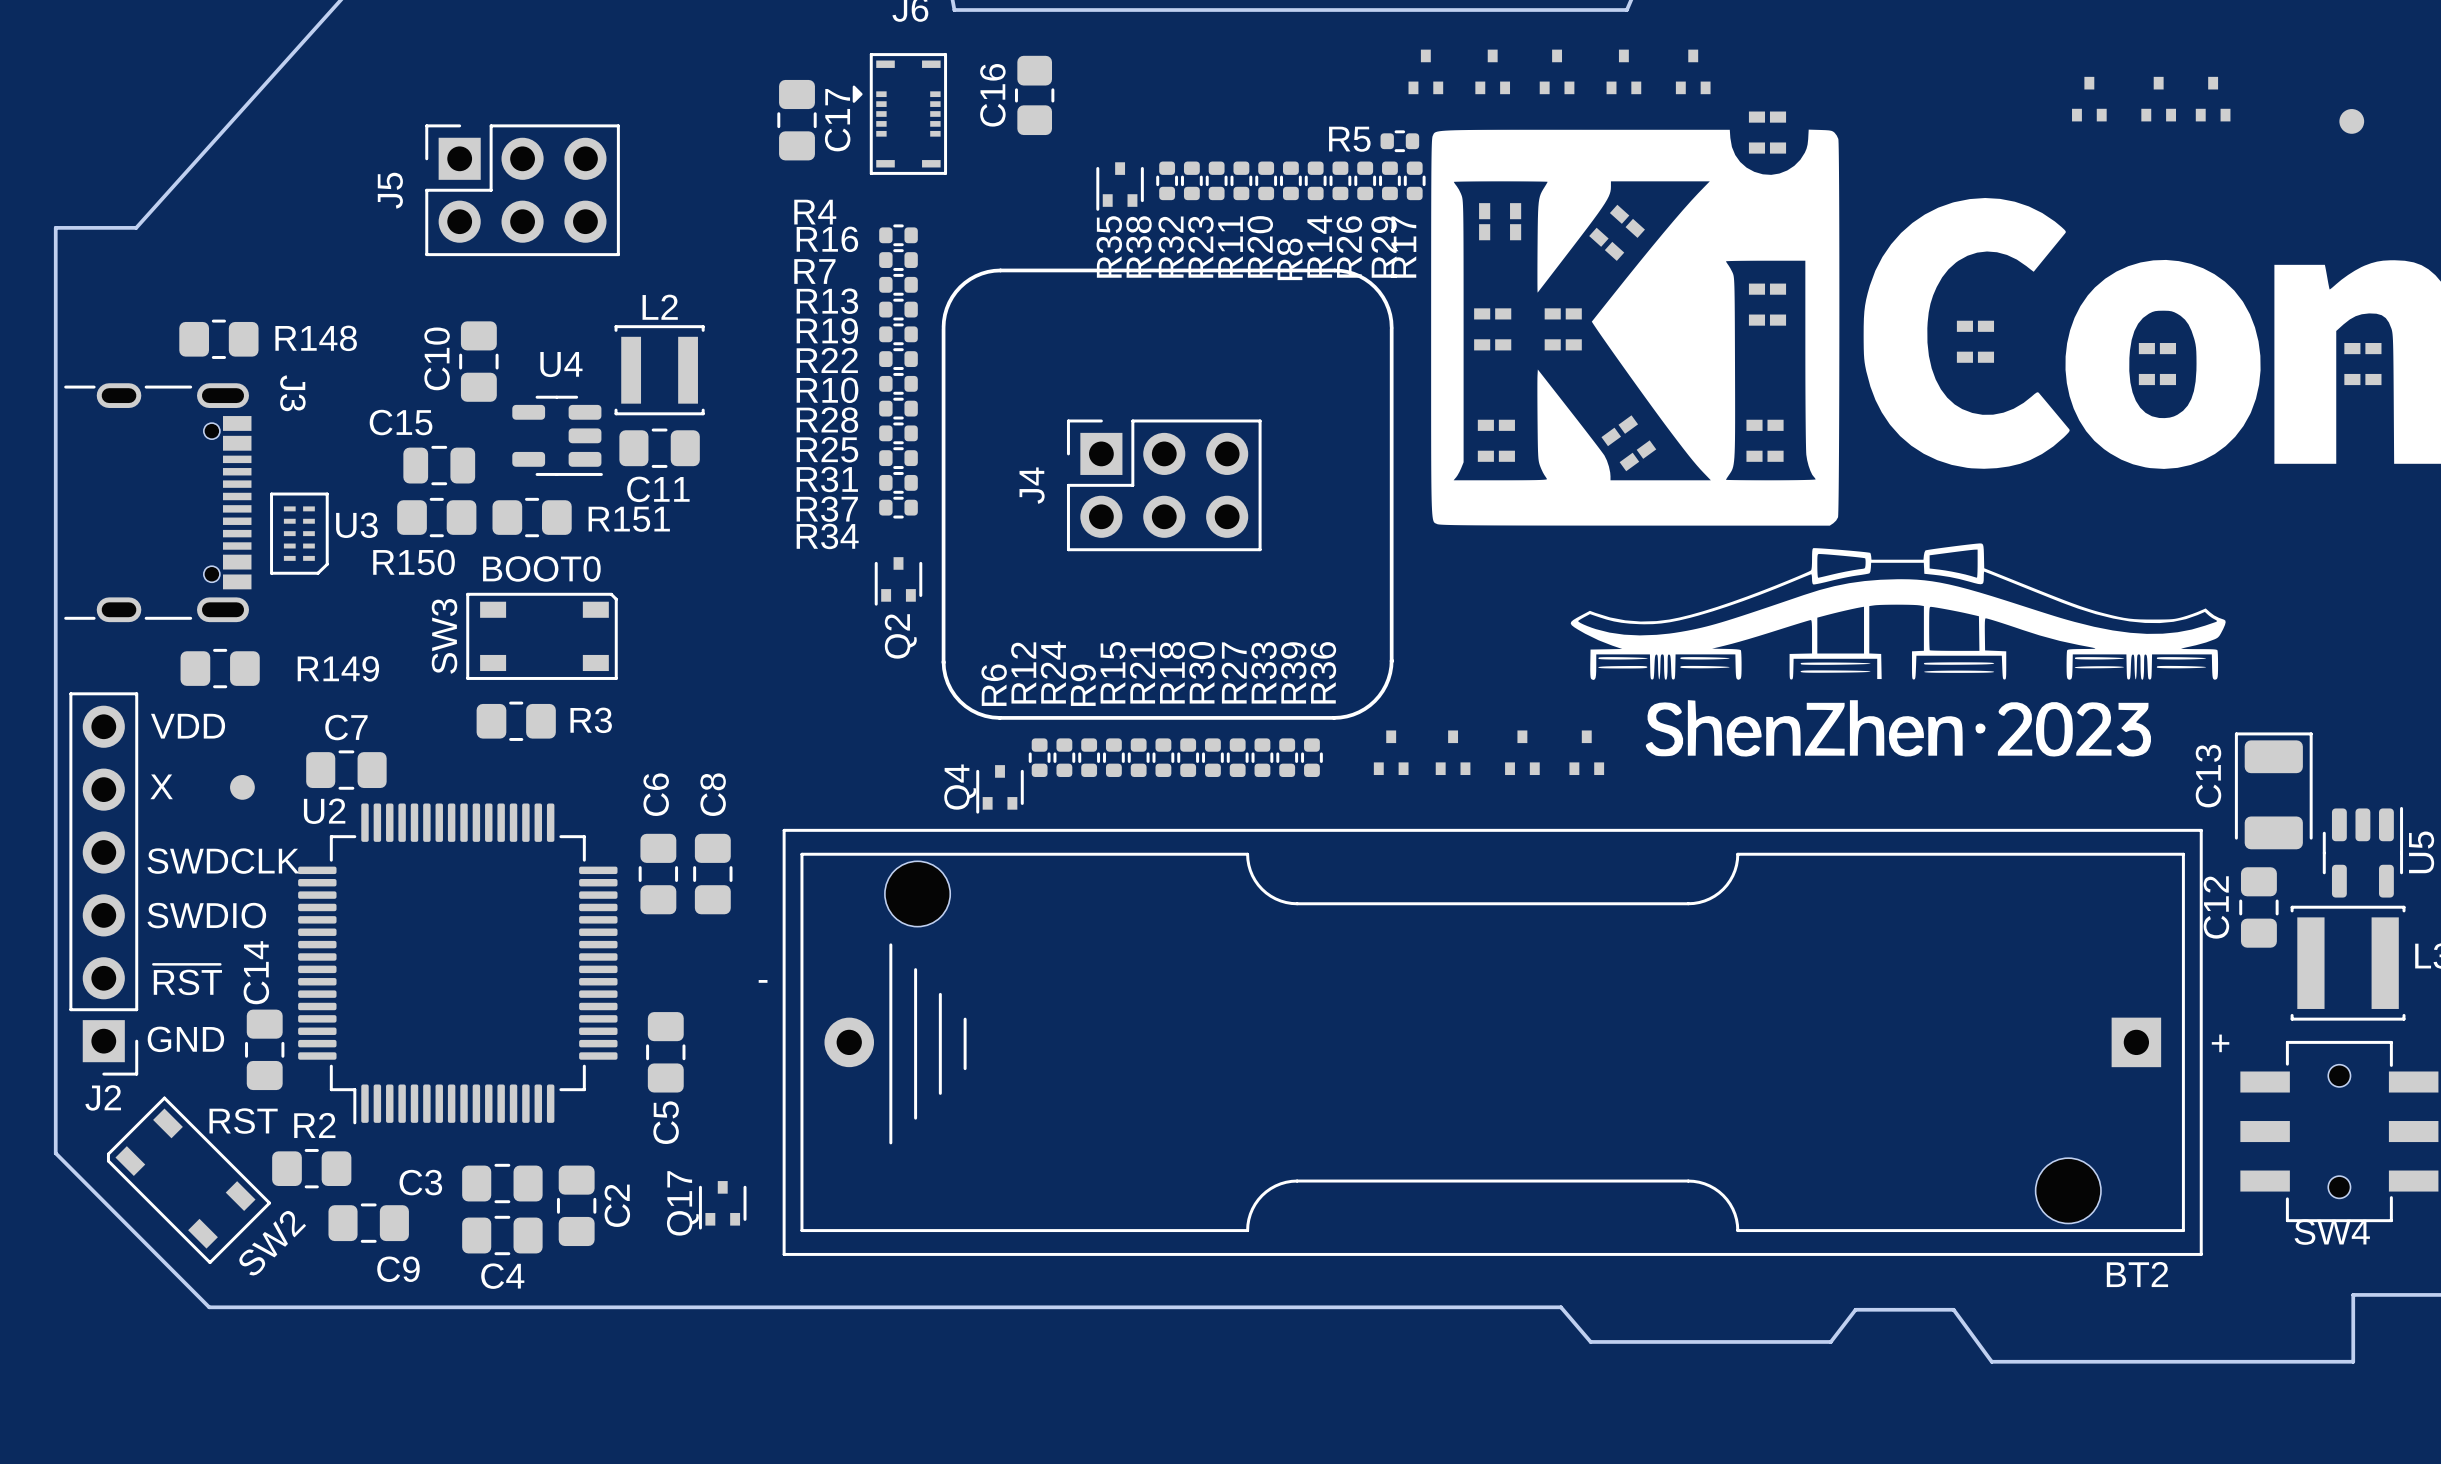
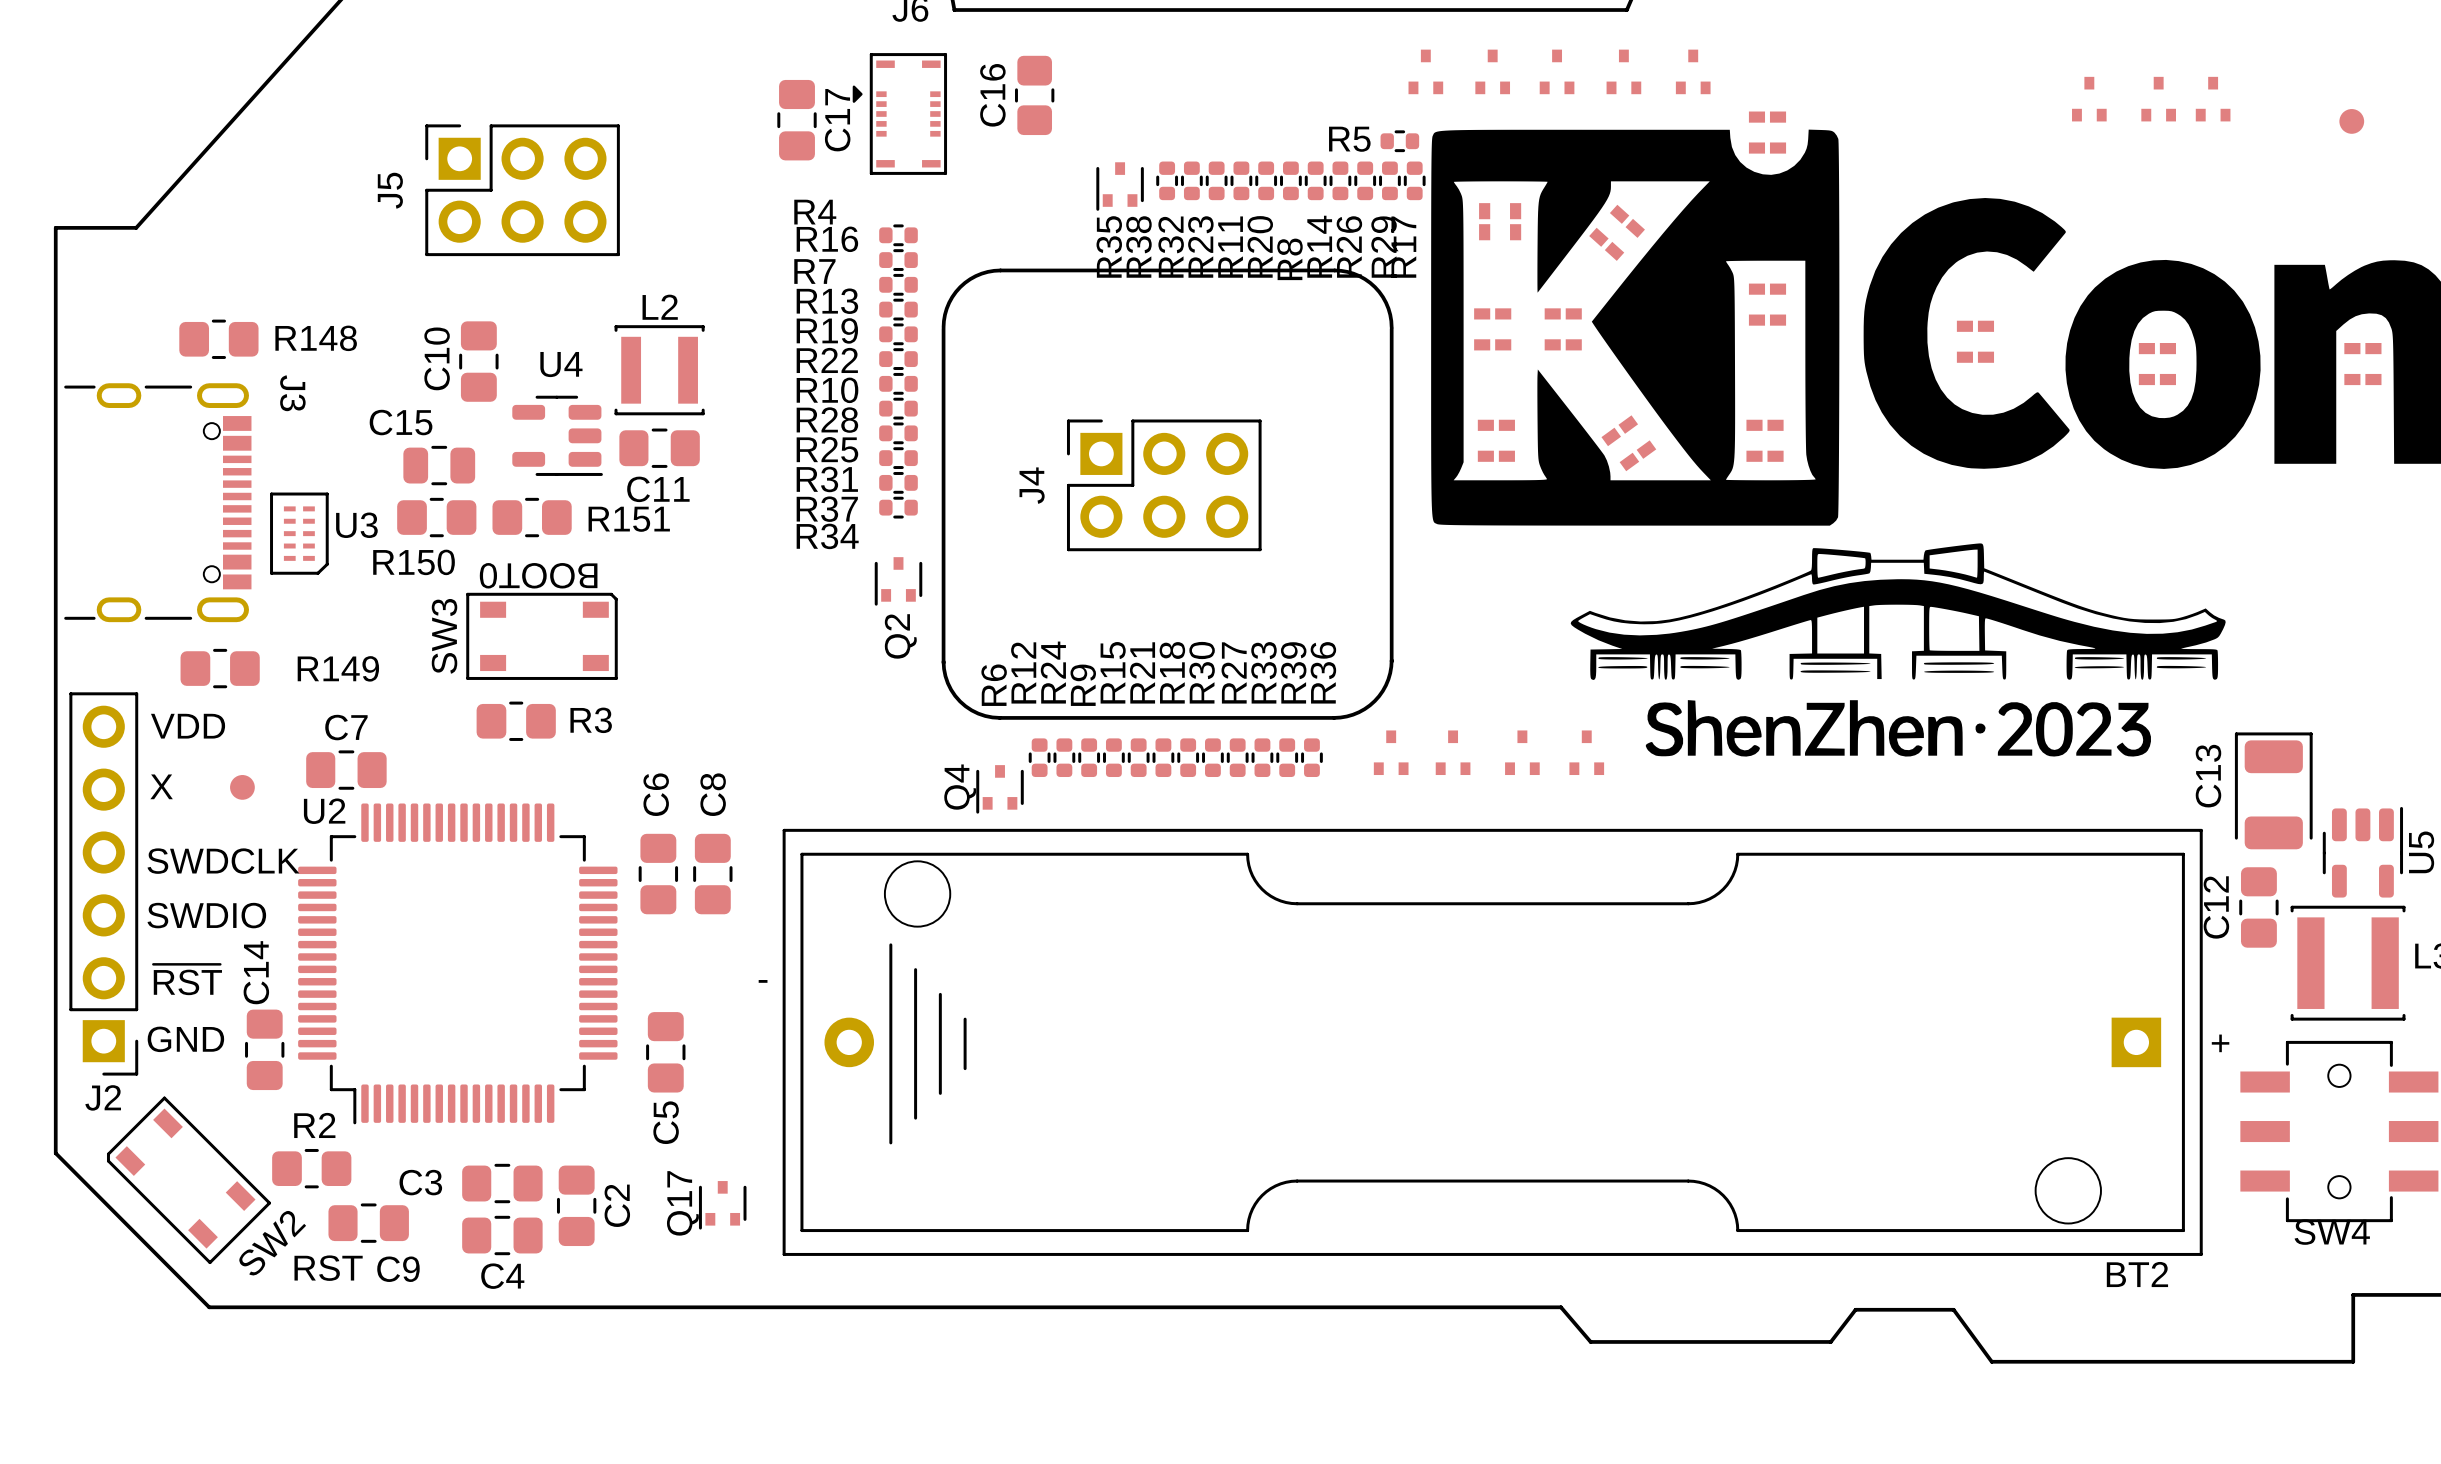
text rotation: 0° (541, 568) -> 180° (538, 575)
text position: RST (243, 1121) -> RST (328, 1268)

